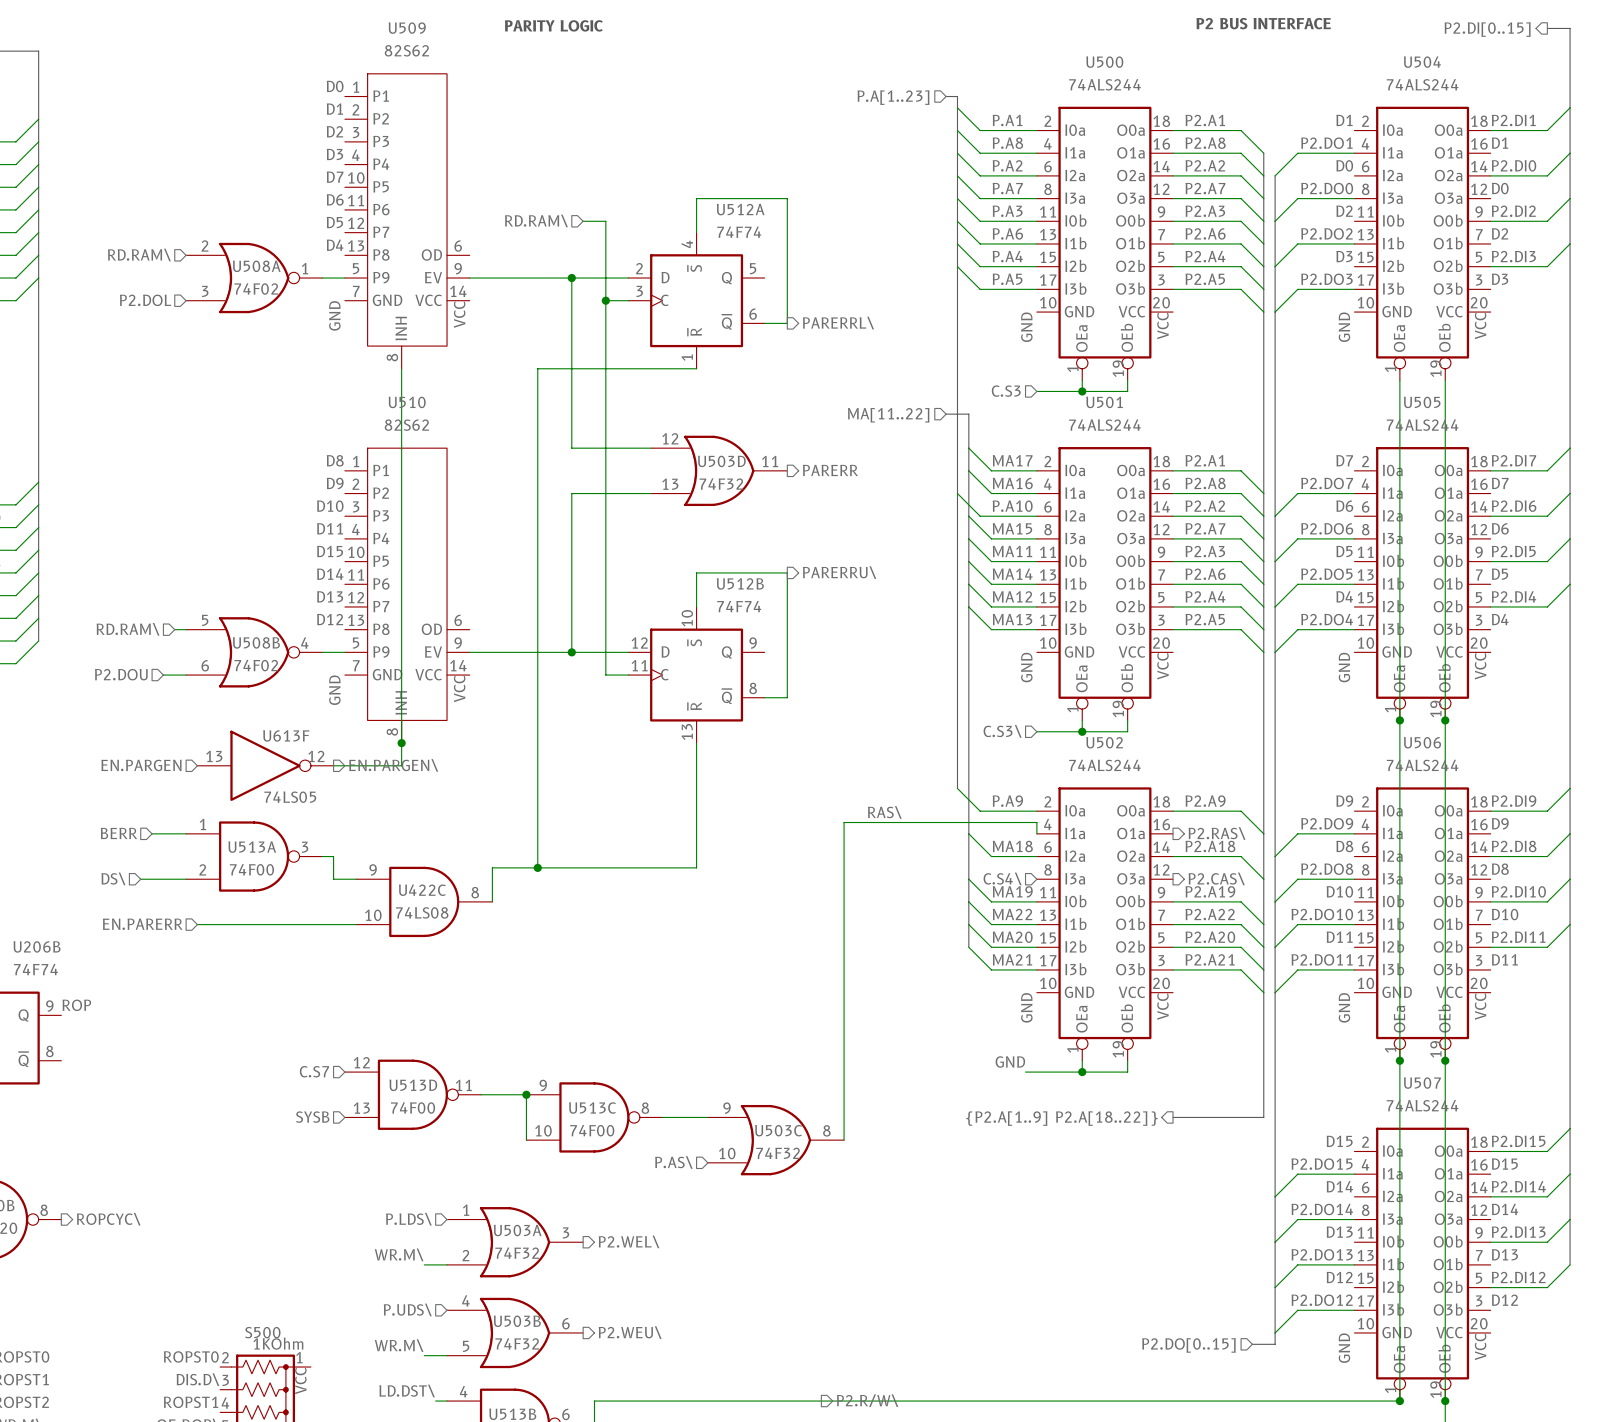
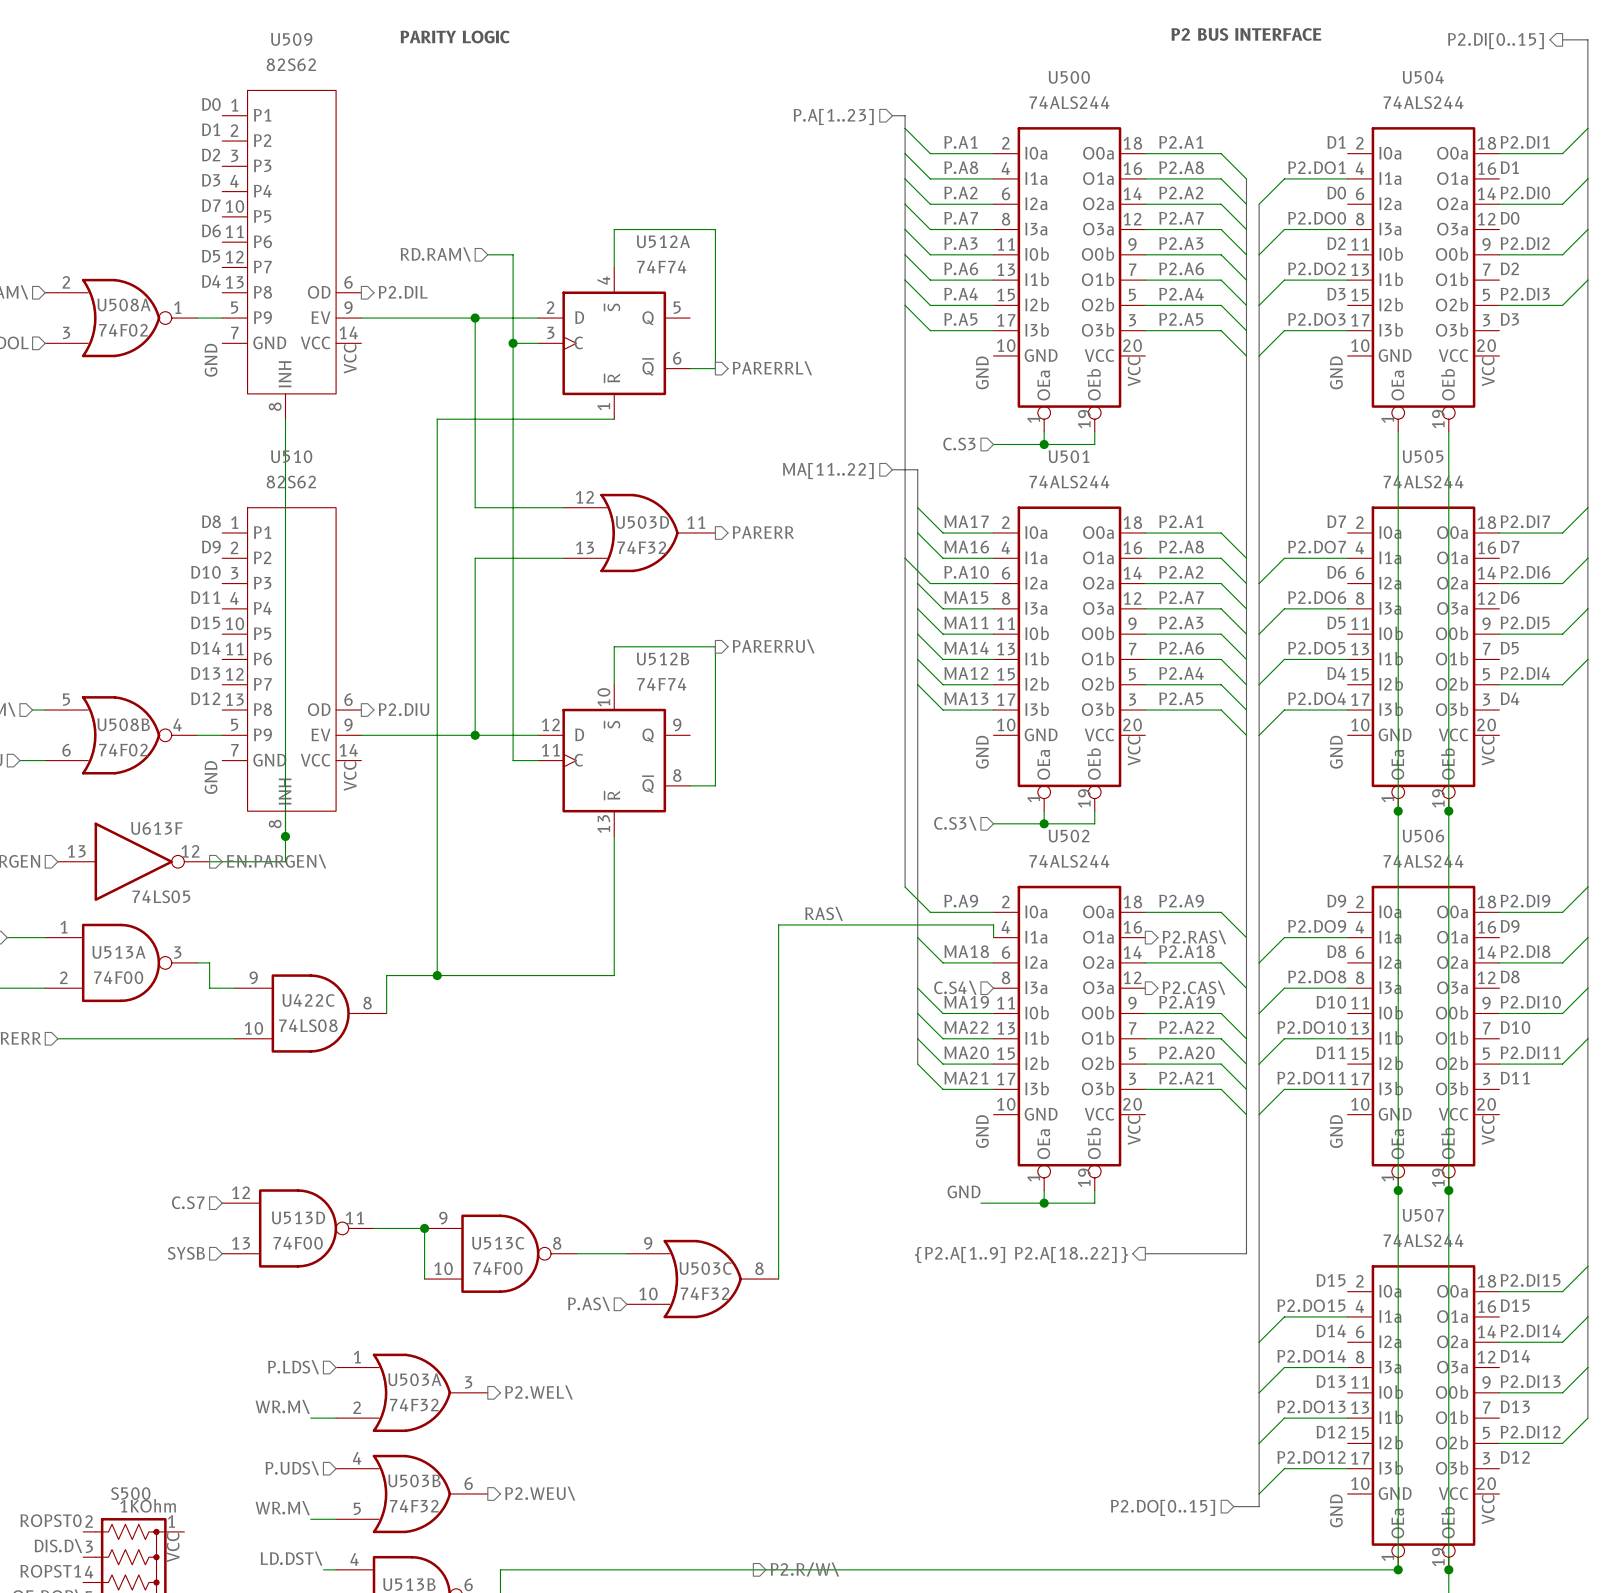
hierarchical label: none -> P2.DIL (403, 292)
hierarchical label: none -> P2.DIU (403, 709)

